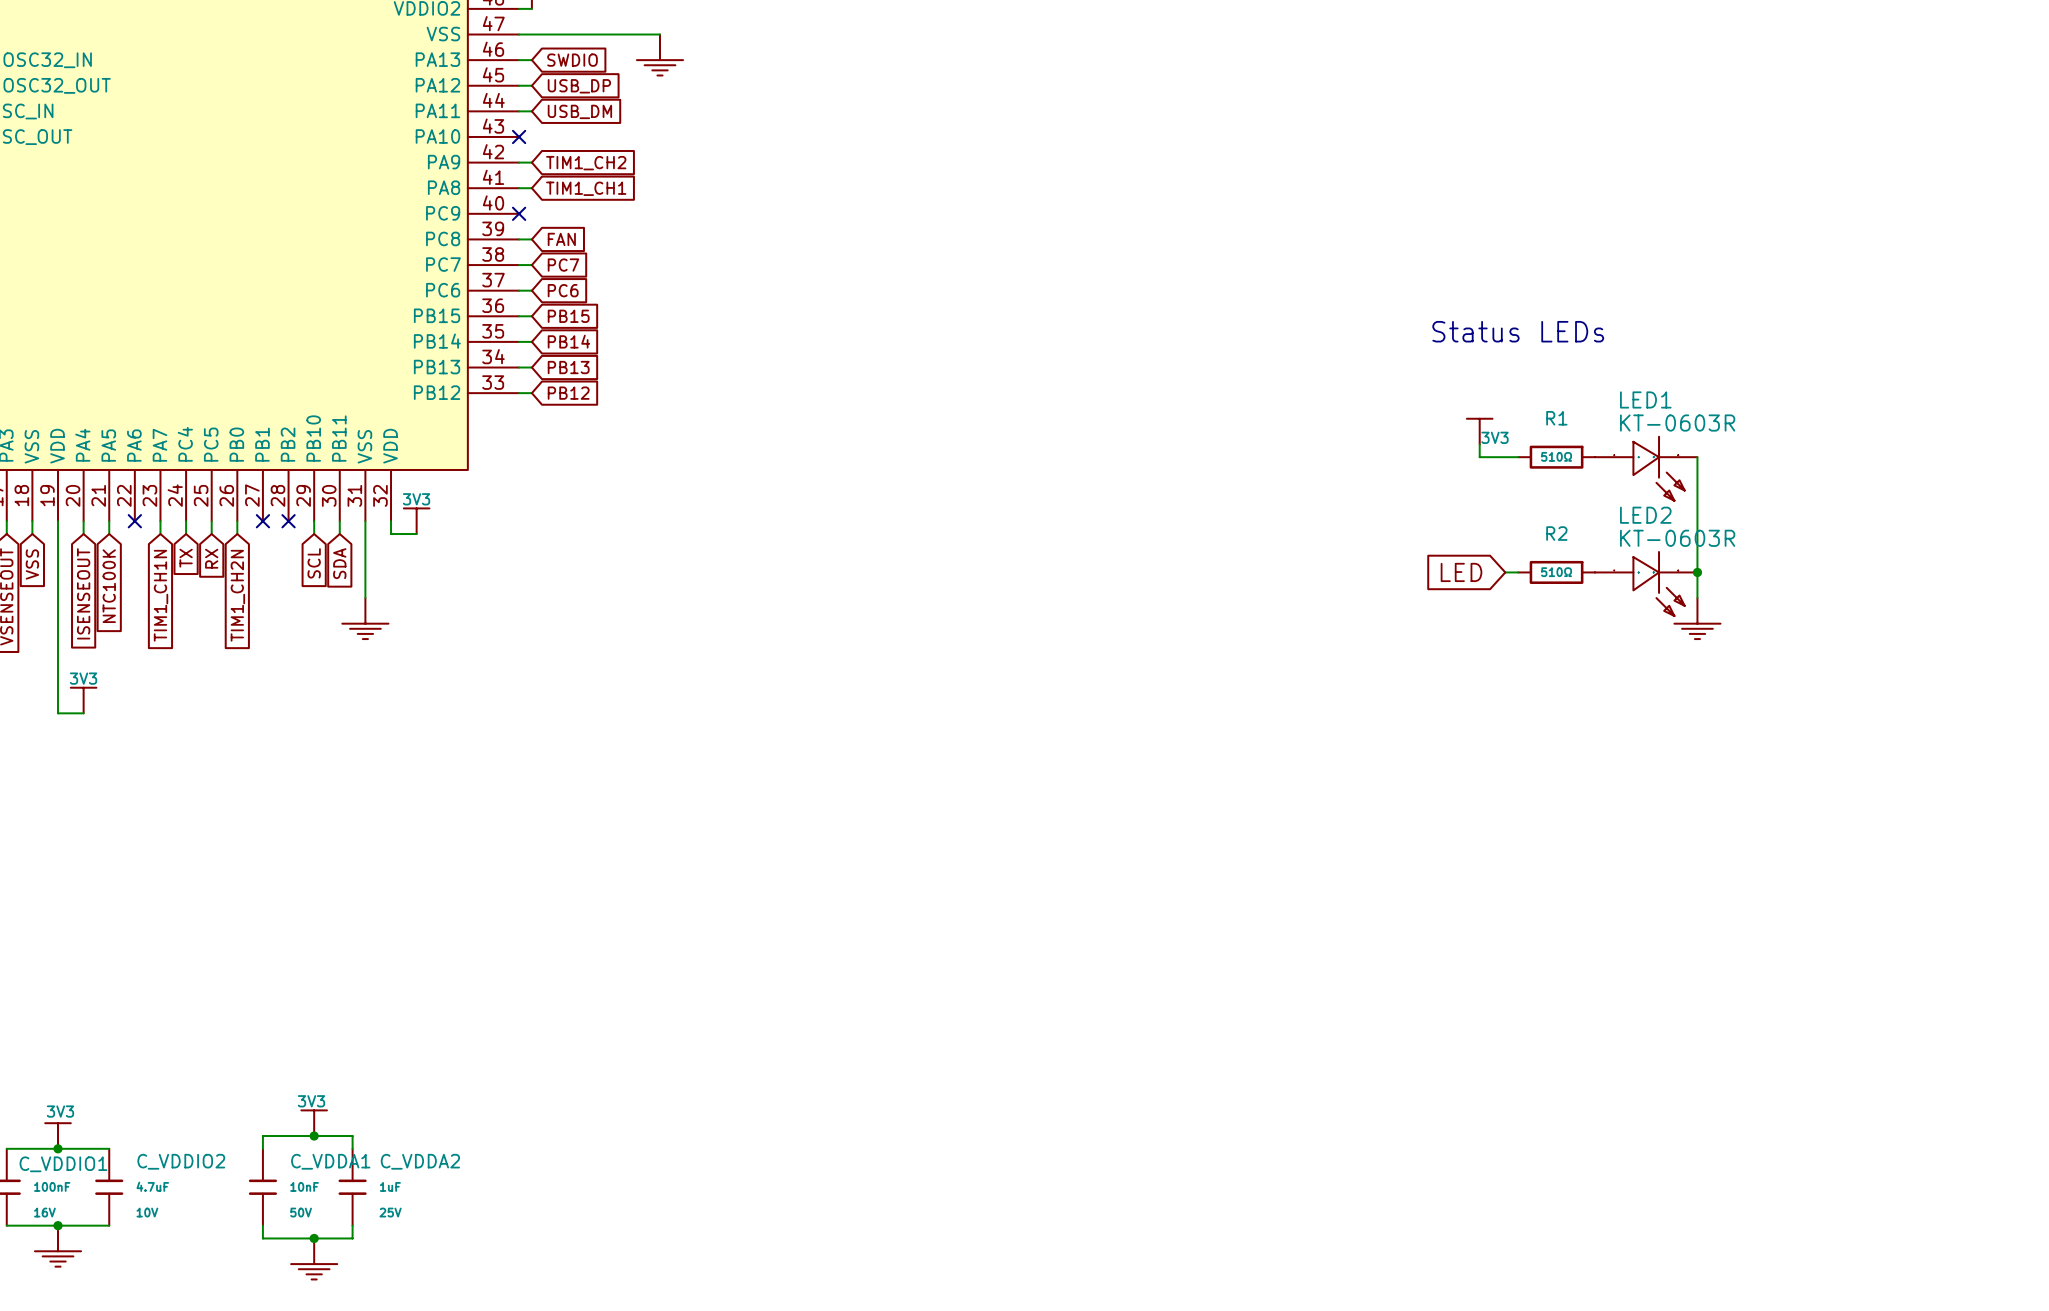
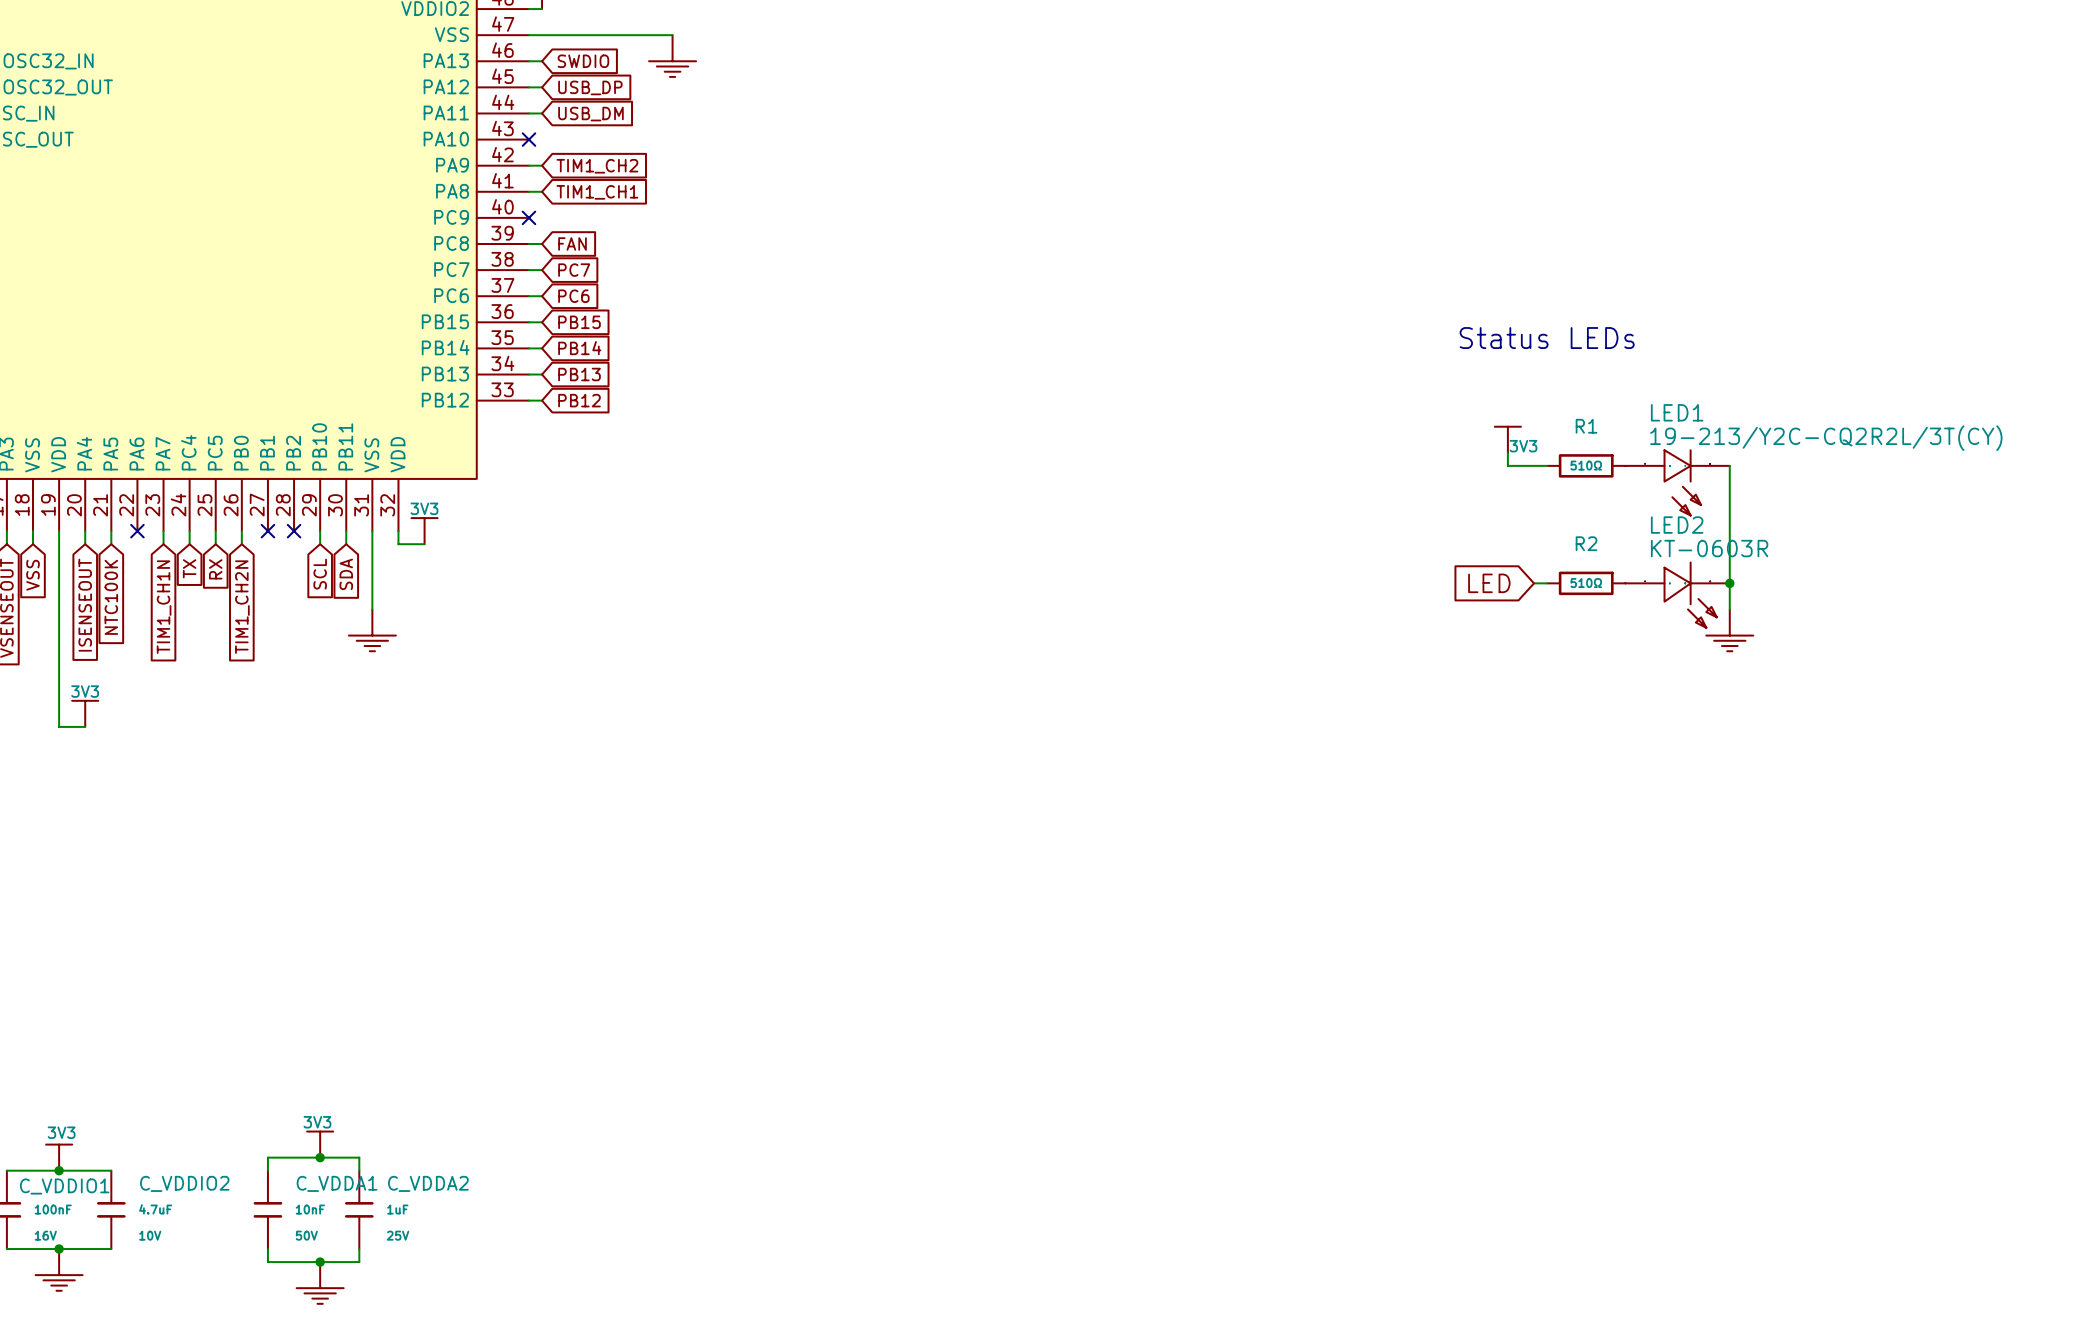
LED1 value: KT-0603R (1677, 423) -> 19-213/Y2C-CQ2R2L/3T(CY) (1826, 438)
LED1 symbol: [1594, 436, 1698, 501] -> [1625, 450, 1730, 516]

